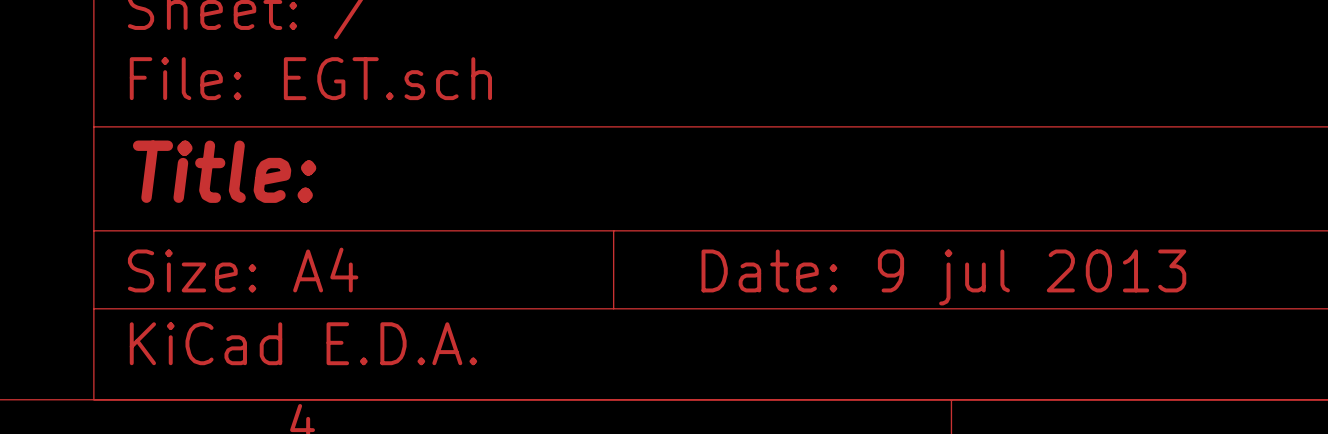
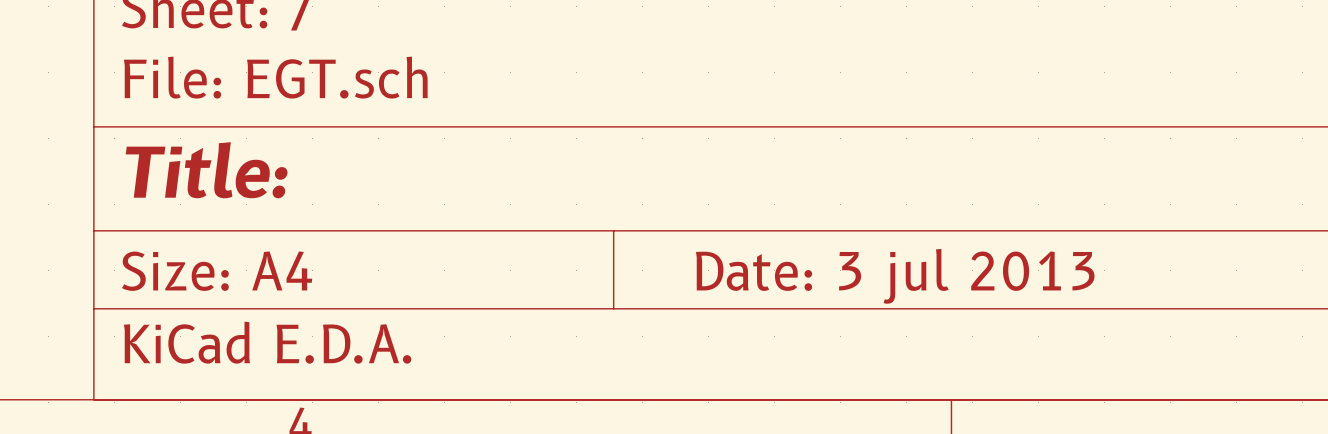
title block: Date: 9 jul 2013 (943, 277) -> Date: 3 jul 2013 (895, 276)

